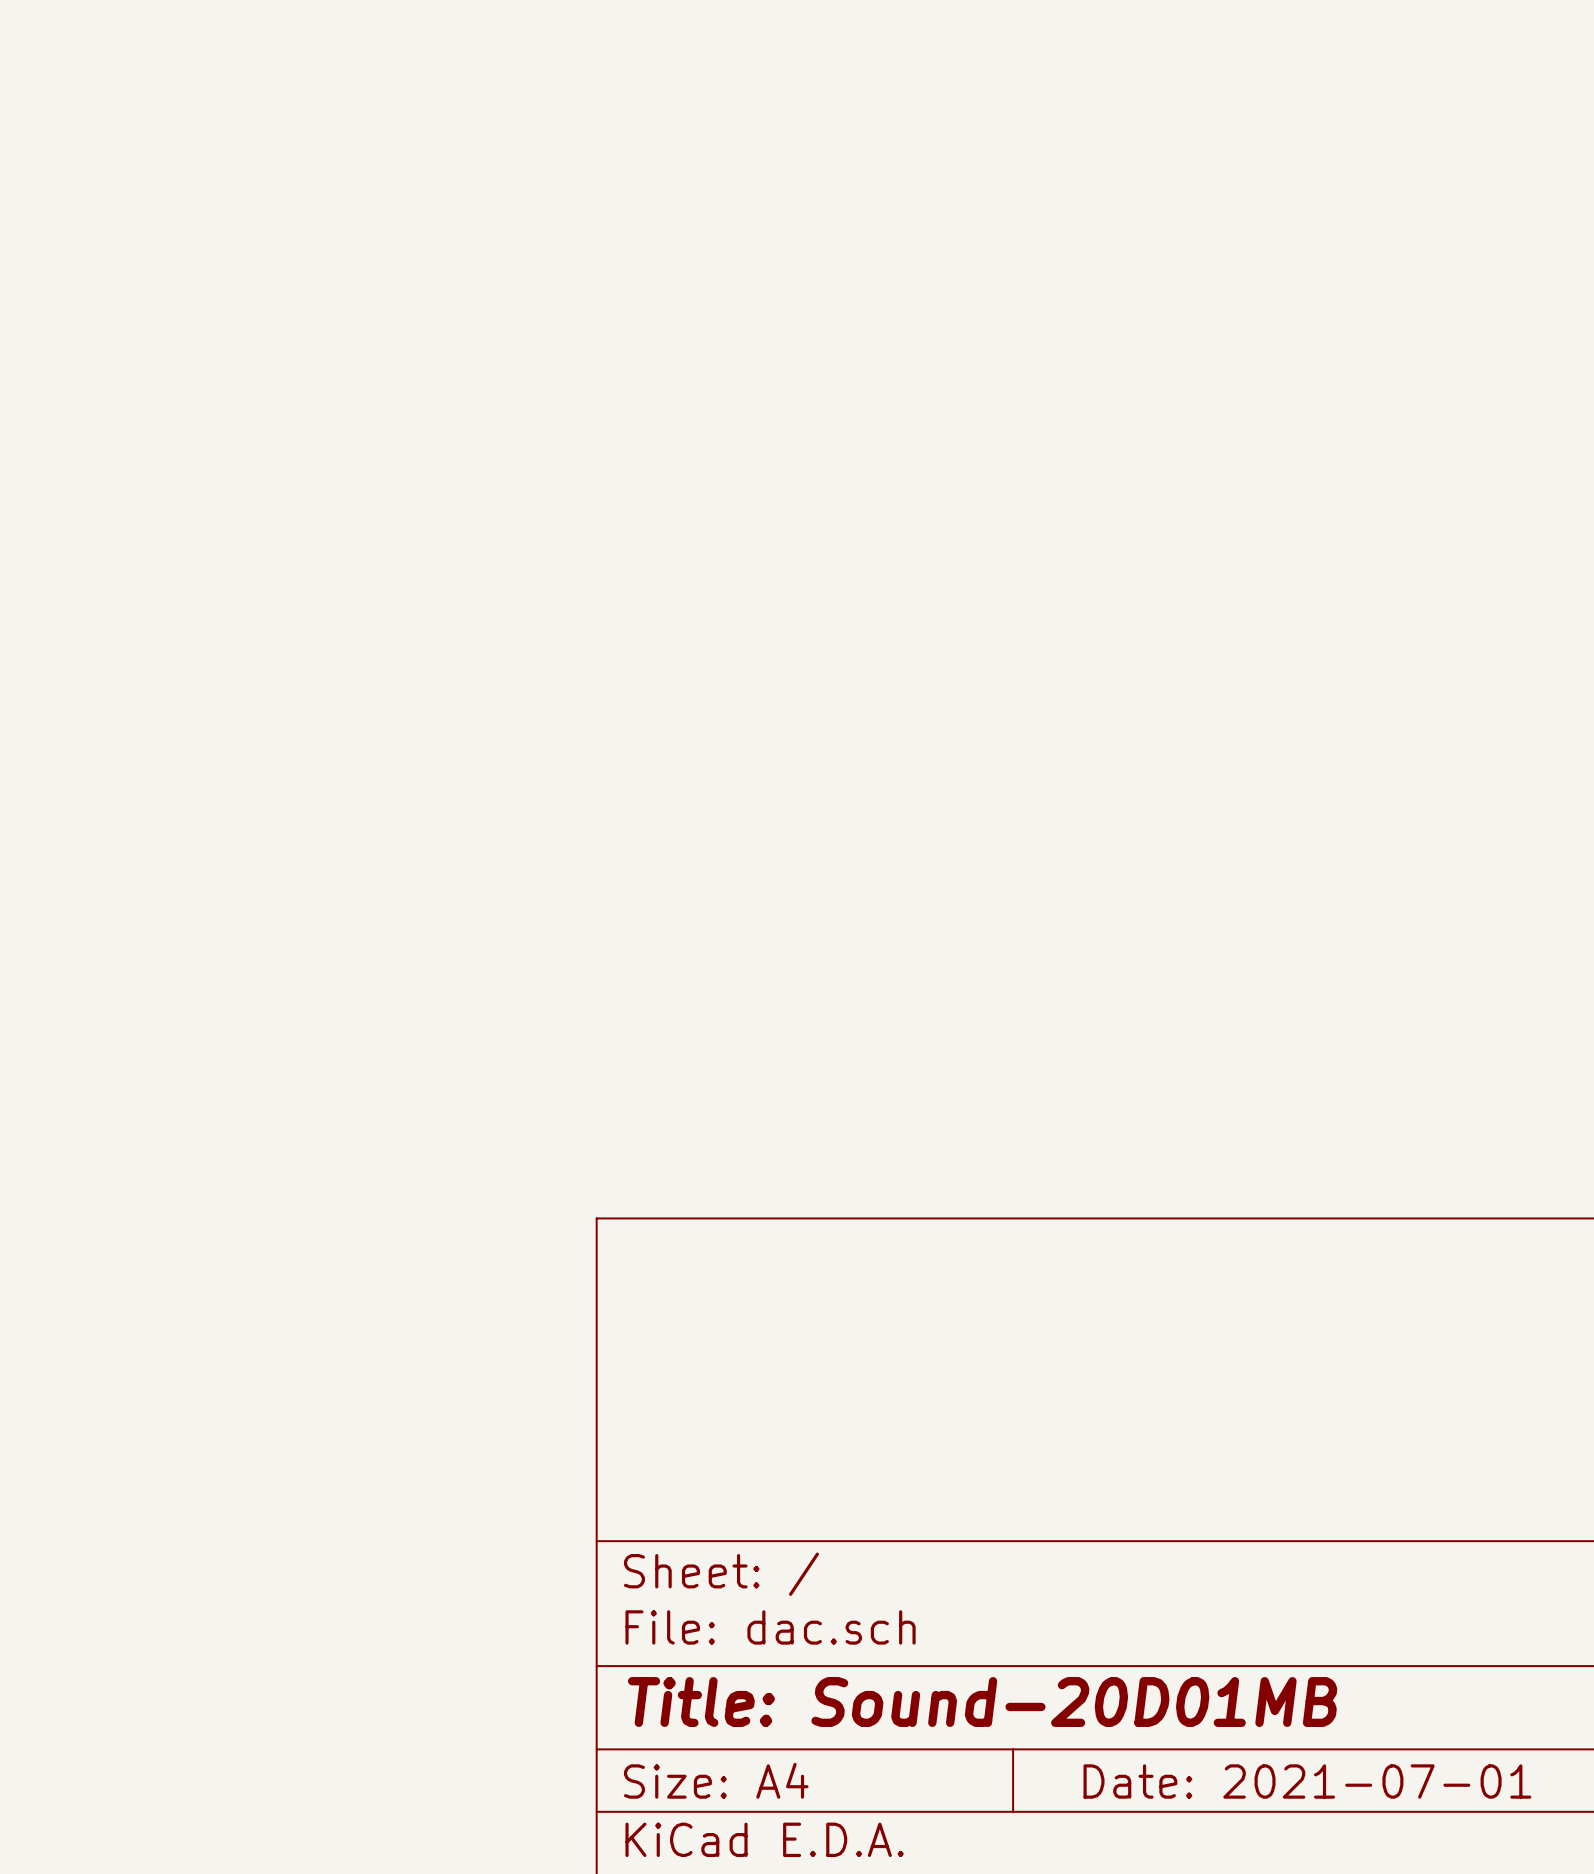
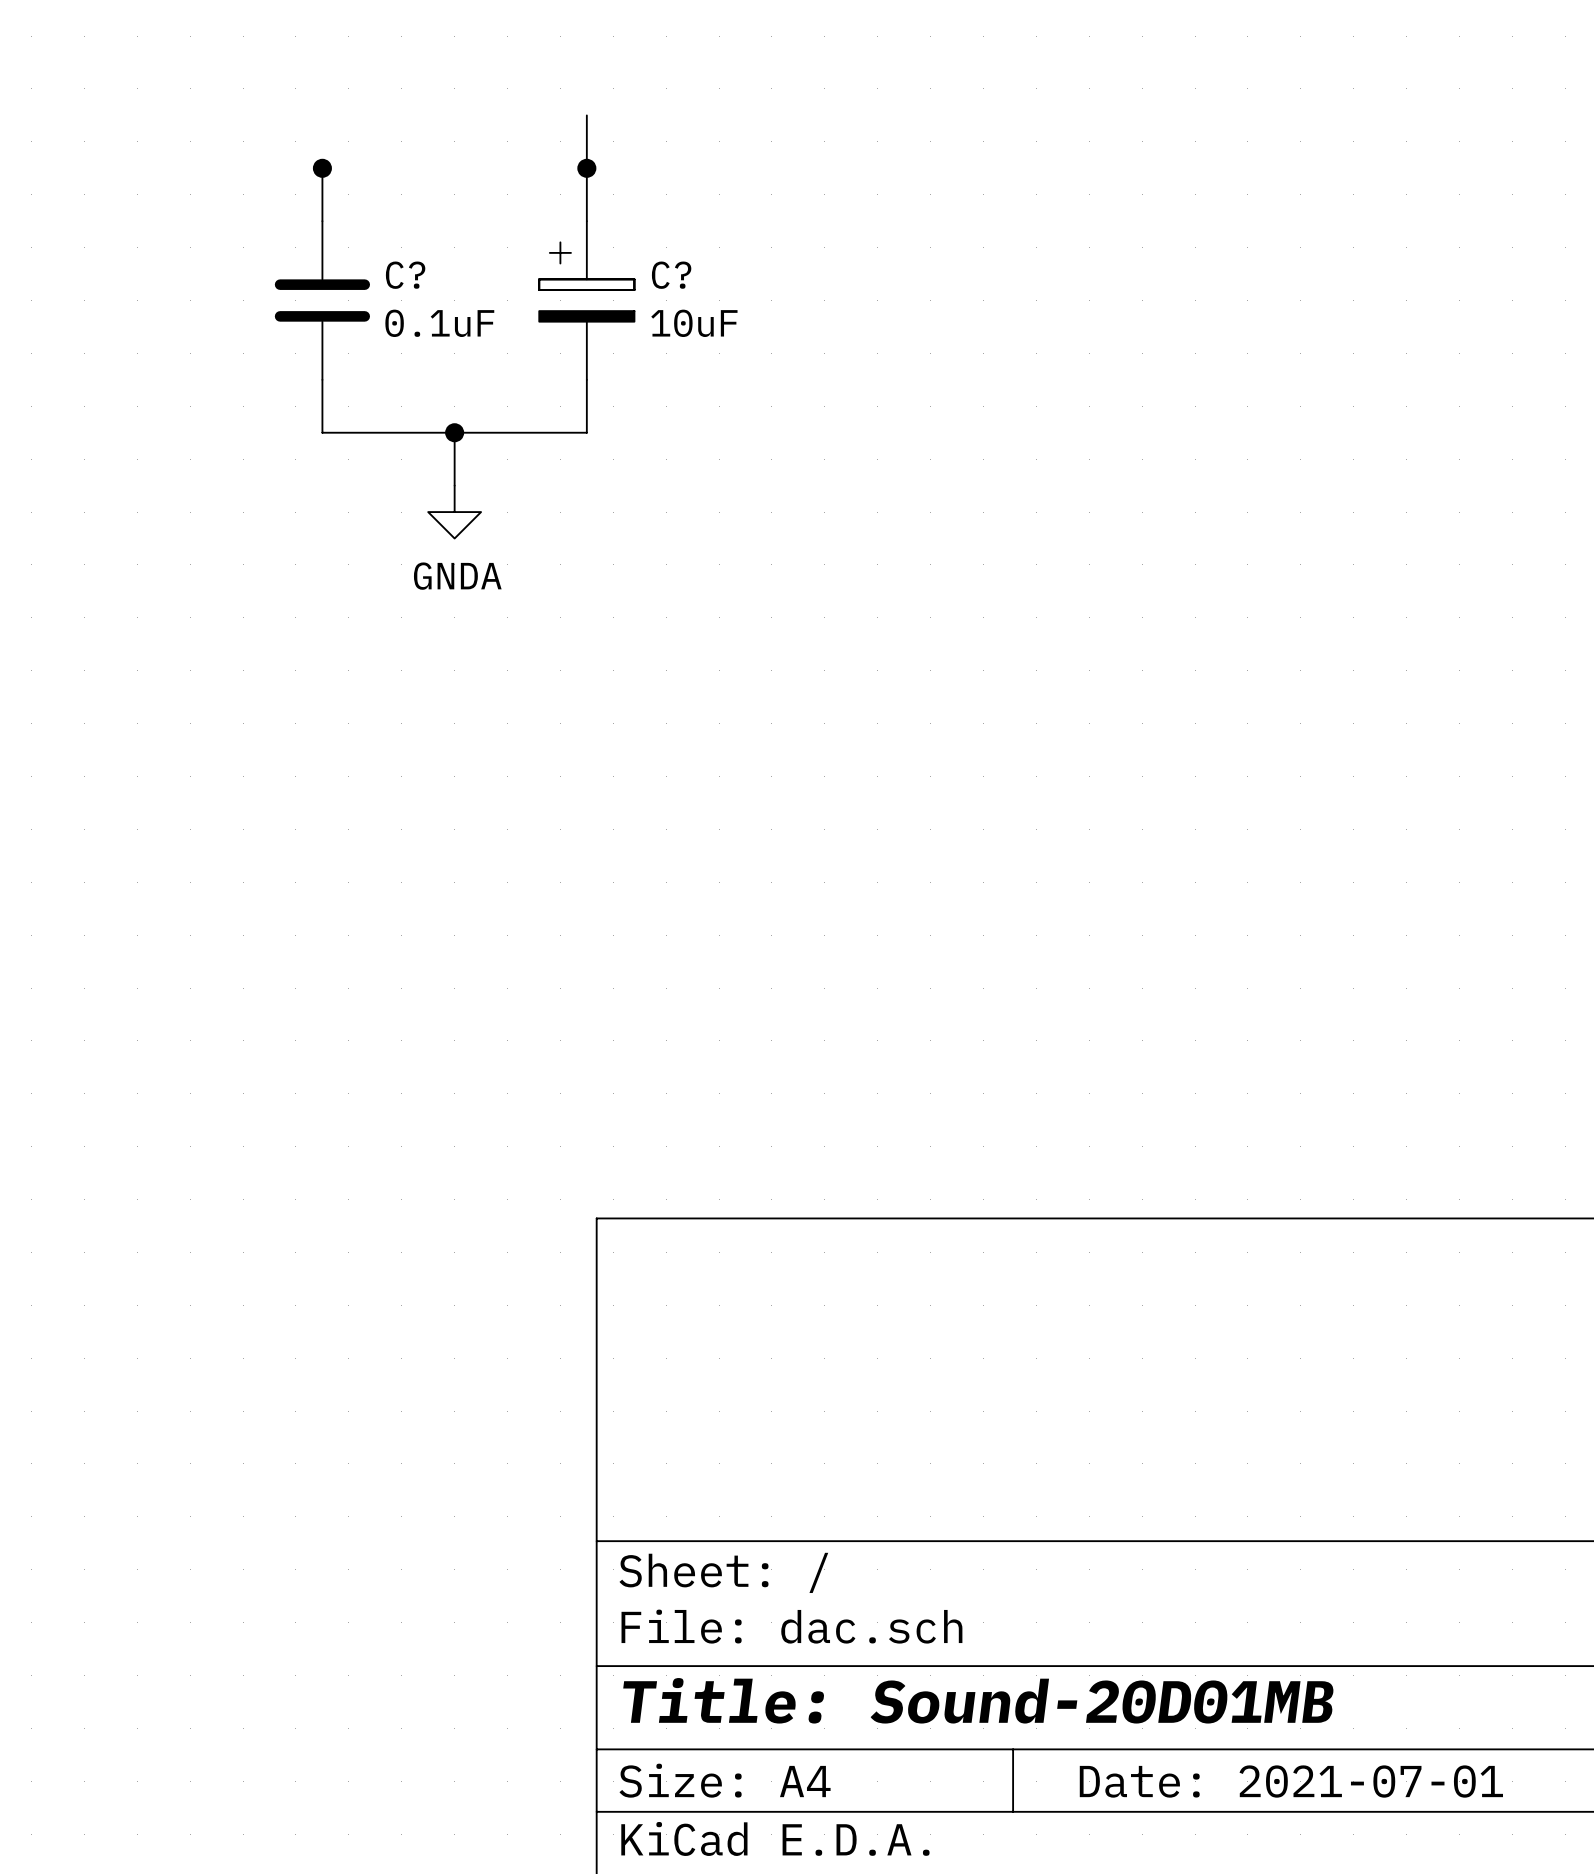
wire: none -> (586, 115) (586, 221)
wire: none -> (322, 168) (322, 221)
junction: none -> (322, 168)
junction: none -> (586, 168)
C?: none -> 0.1uF (322, 300)
C?: none -> 10uF (586, 300)
wire: none -> (322, 379) (322, 432) (586, 432) (586, 379)
wire: none -> (454, 432) (454, 485)
junction: none -> (454, 432)
power symbol: none -> GNDA (454, 512)

